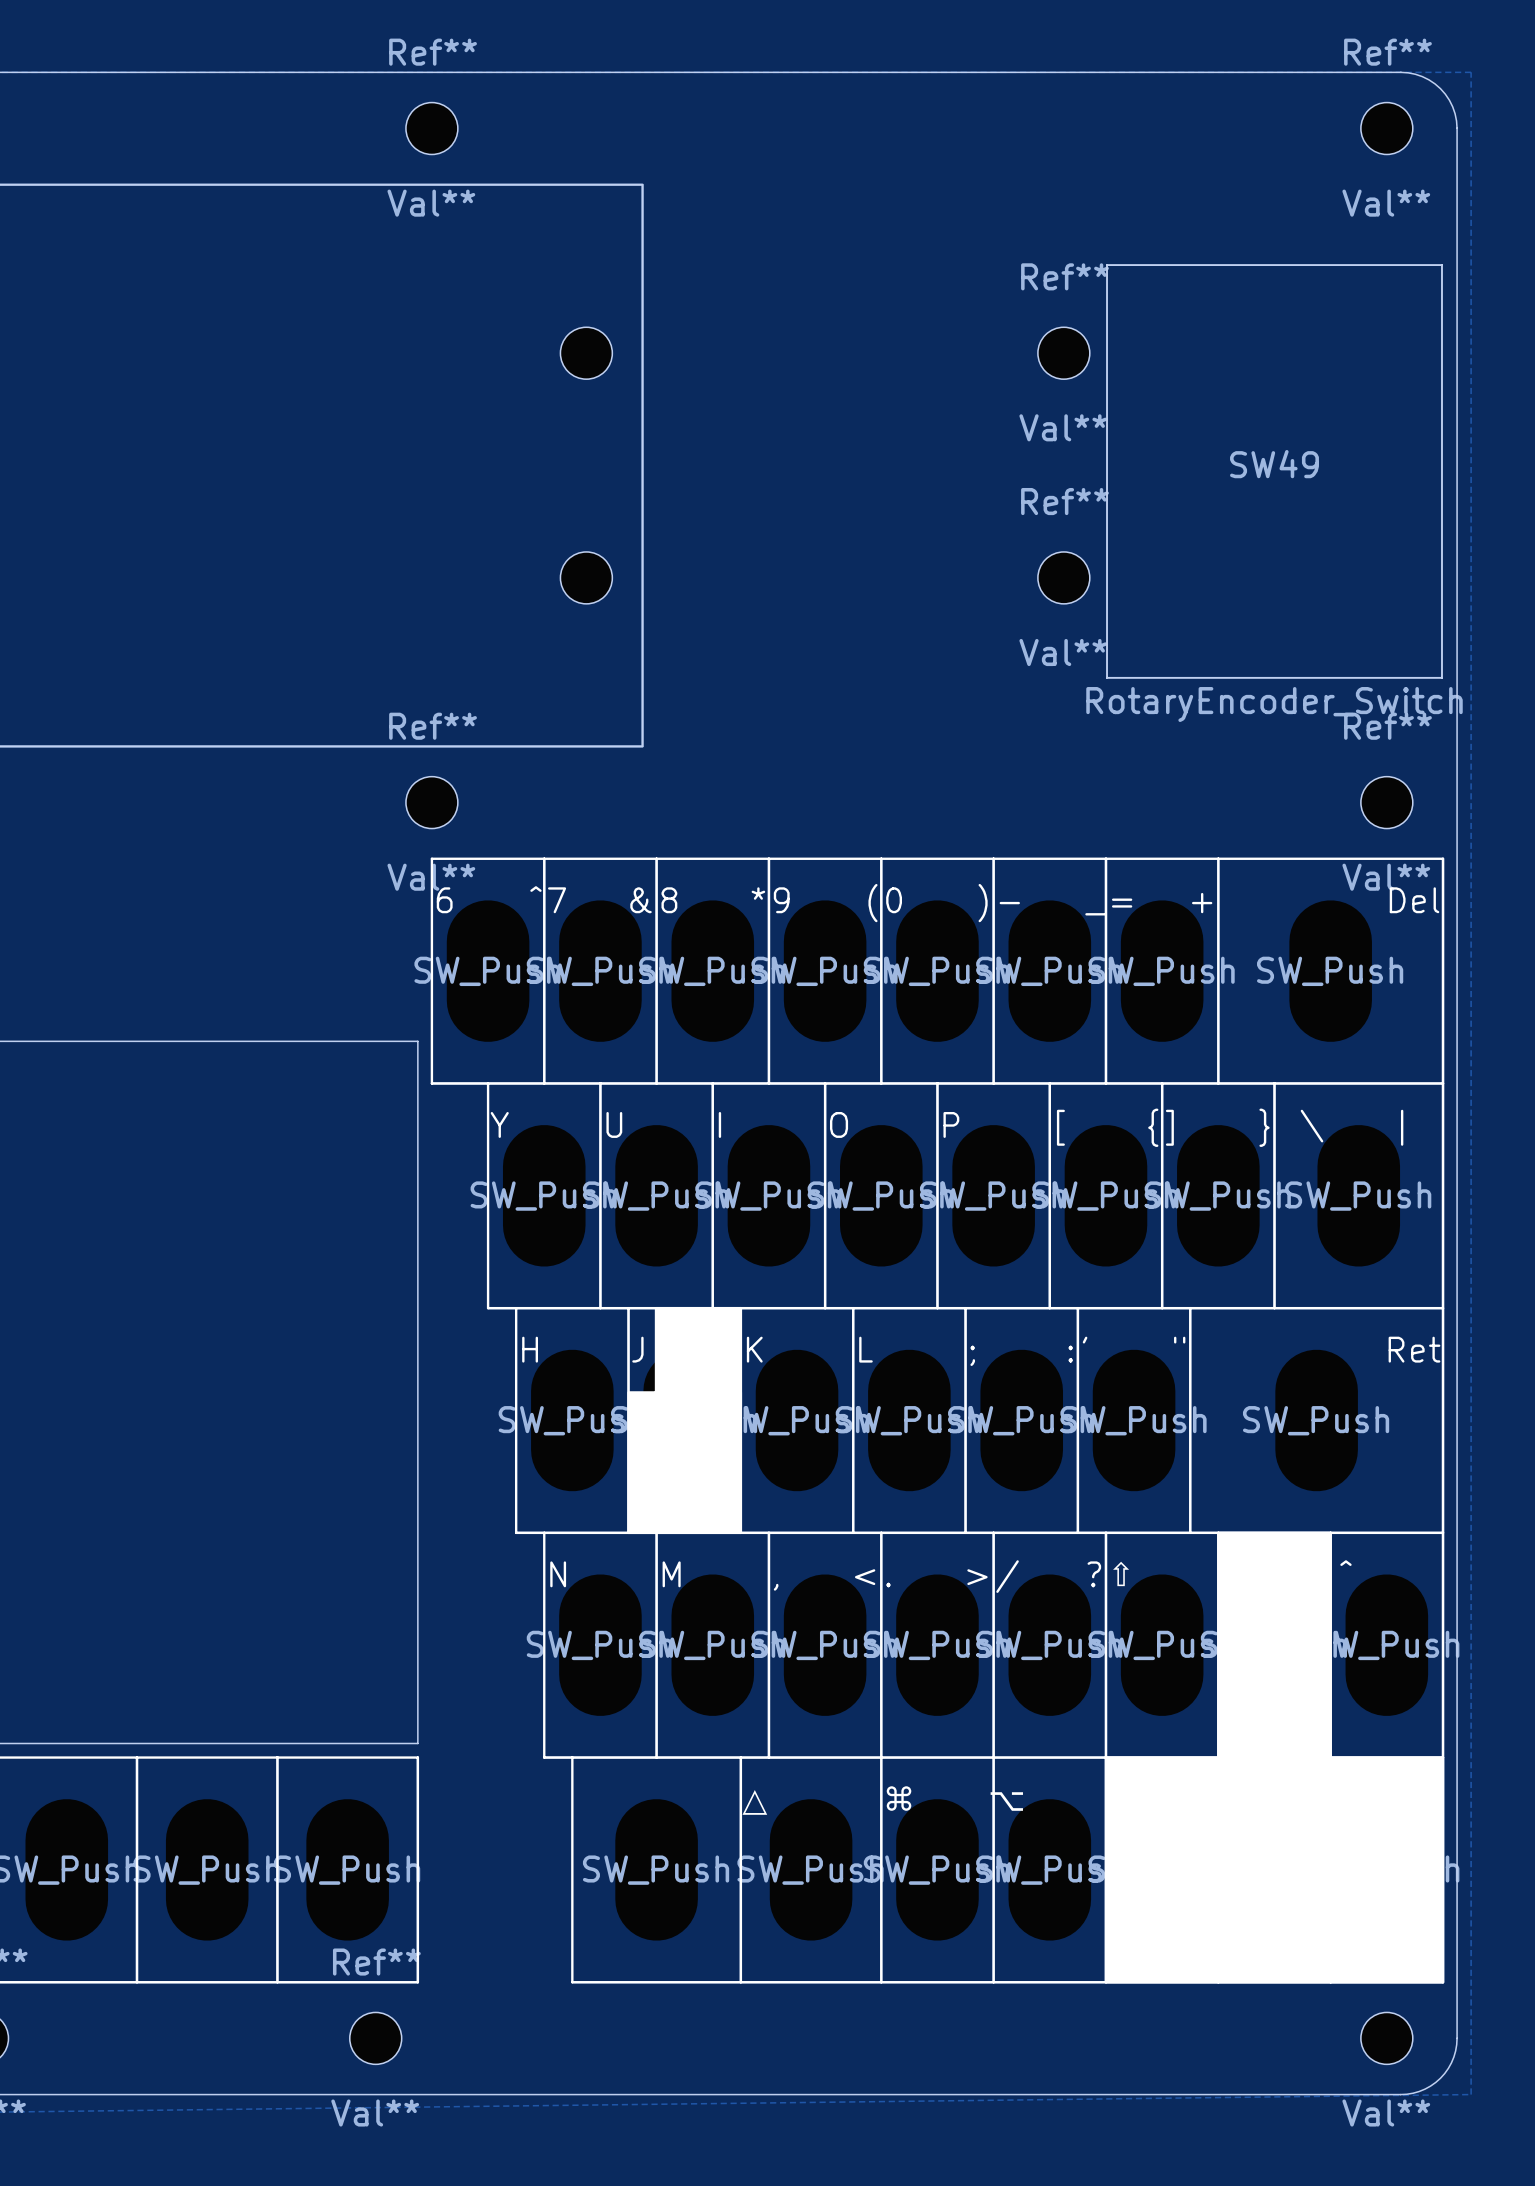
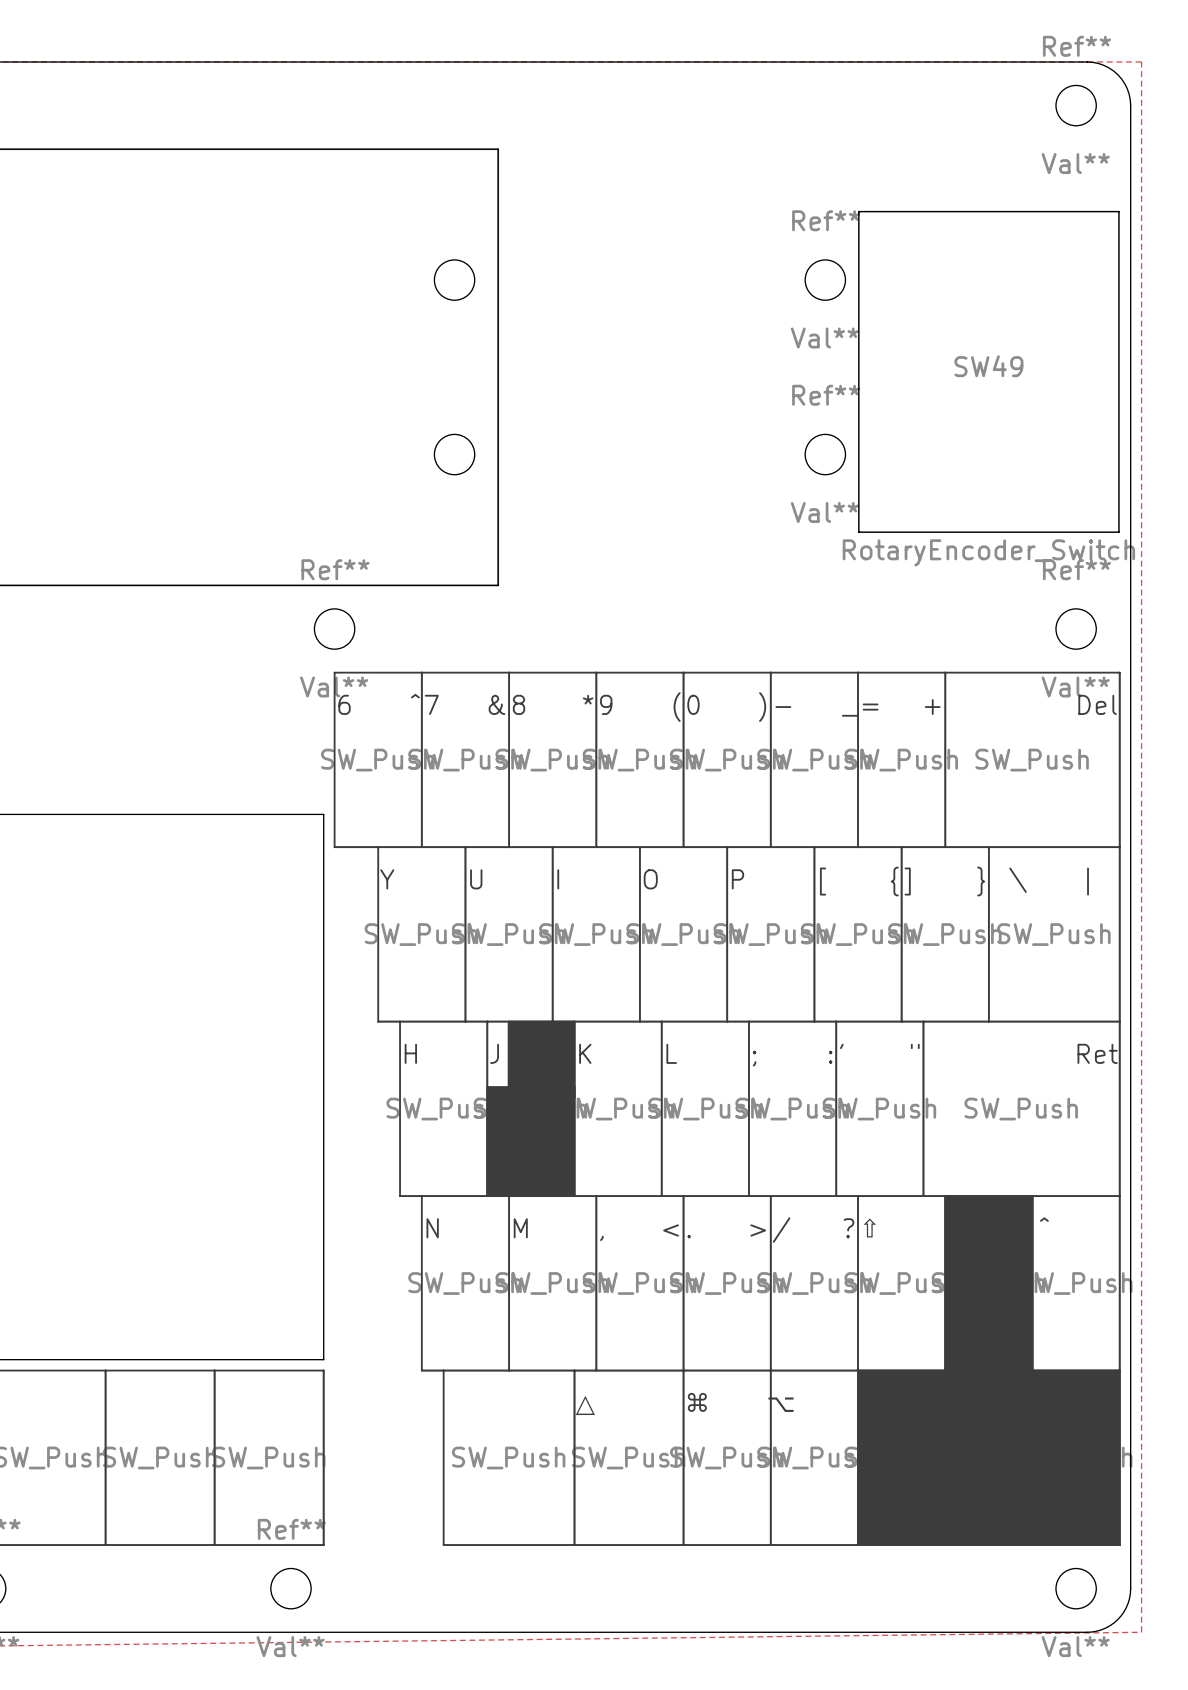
Ref**: Val** (431, 128) -> none

